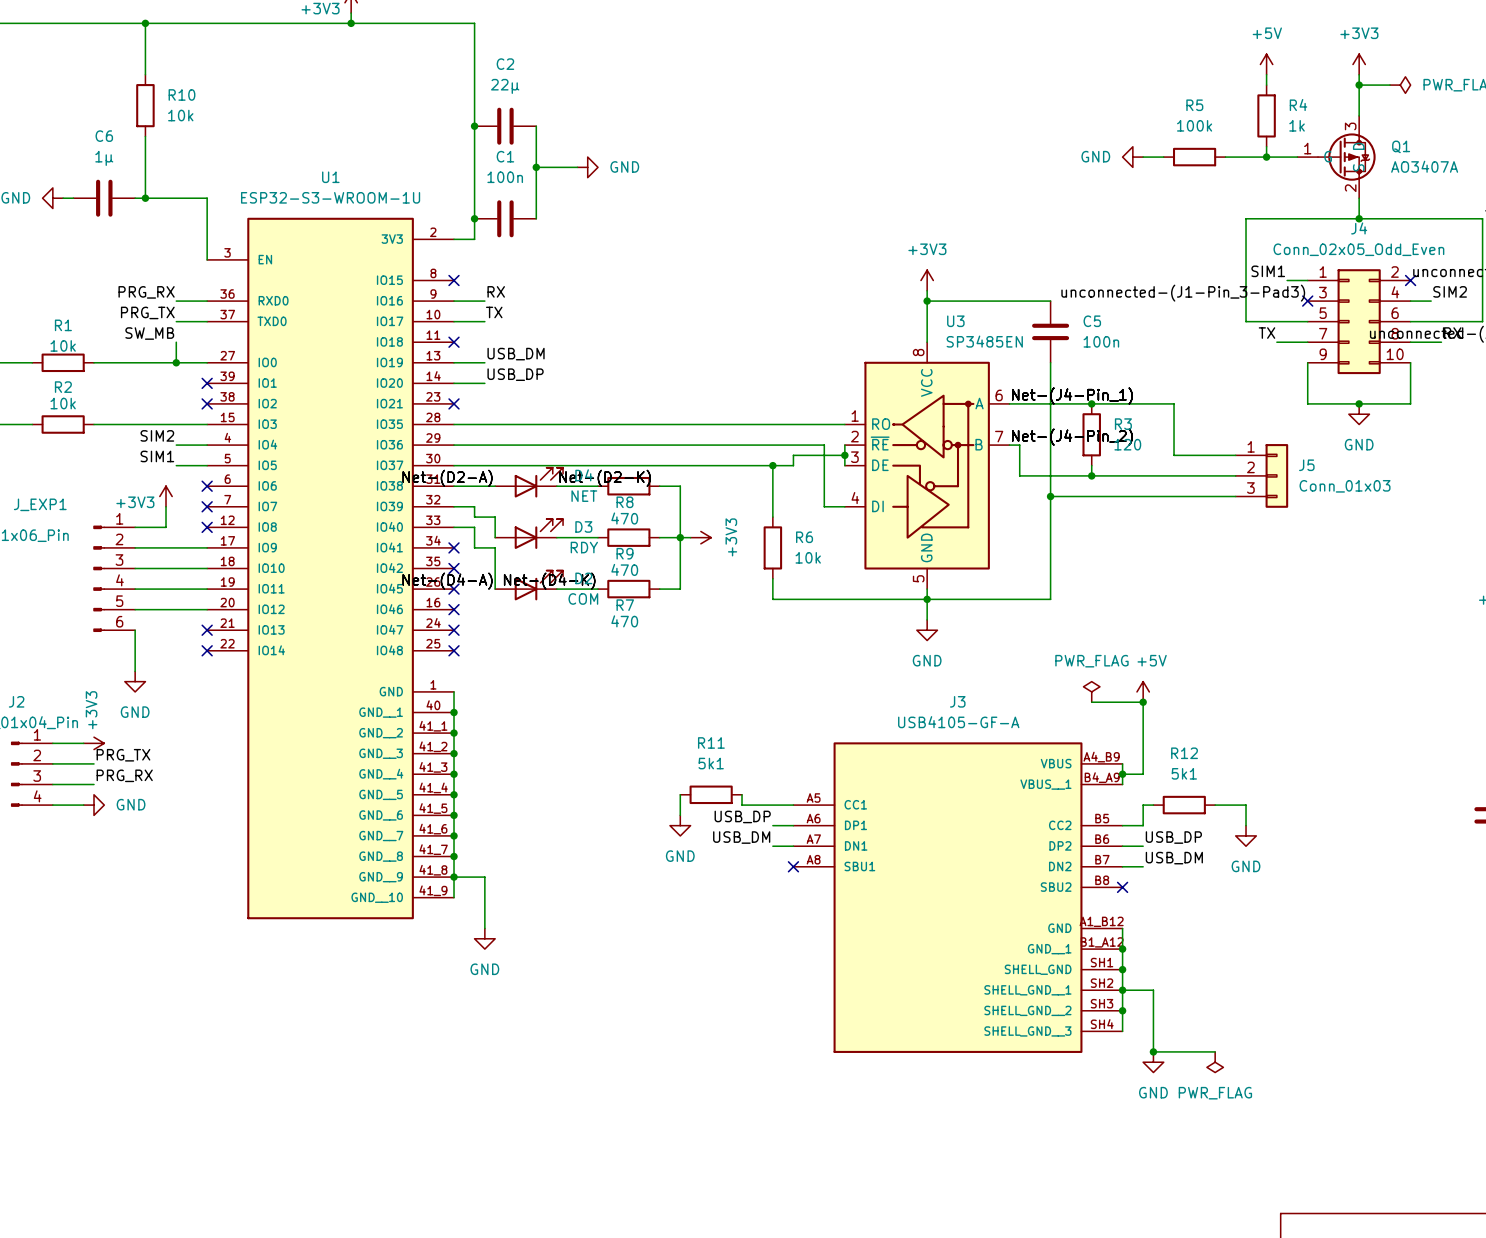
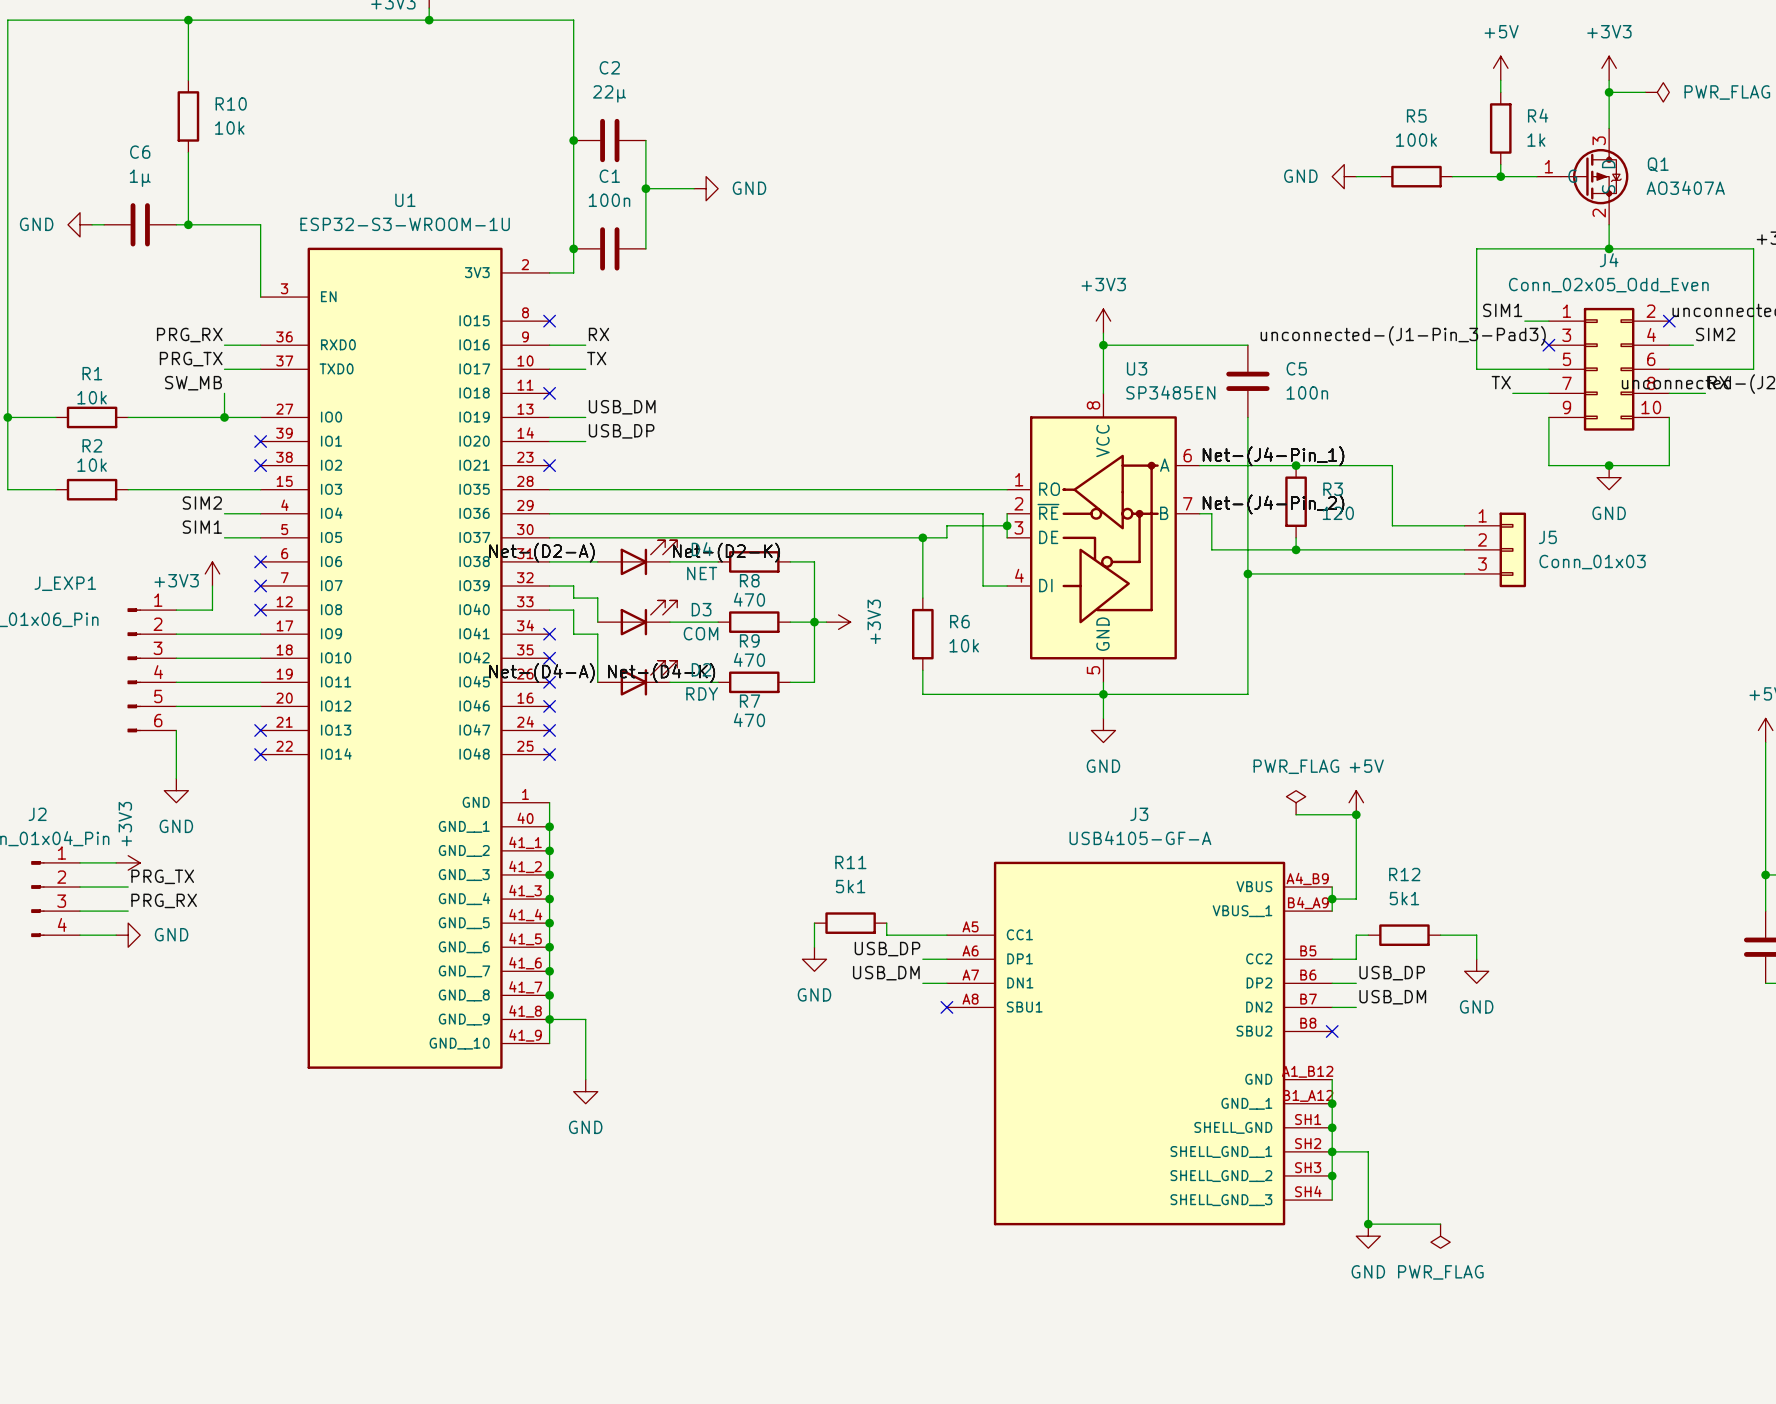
D3 value: RDY (584, 547) -> COM (701, 633)
D2 value: COM (583, 598) -> RDY (702, 693)

